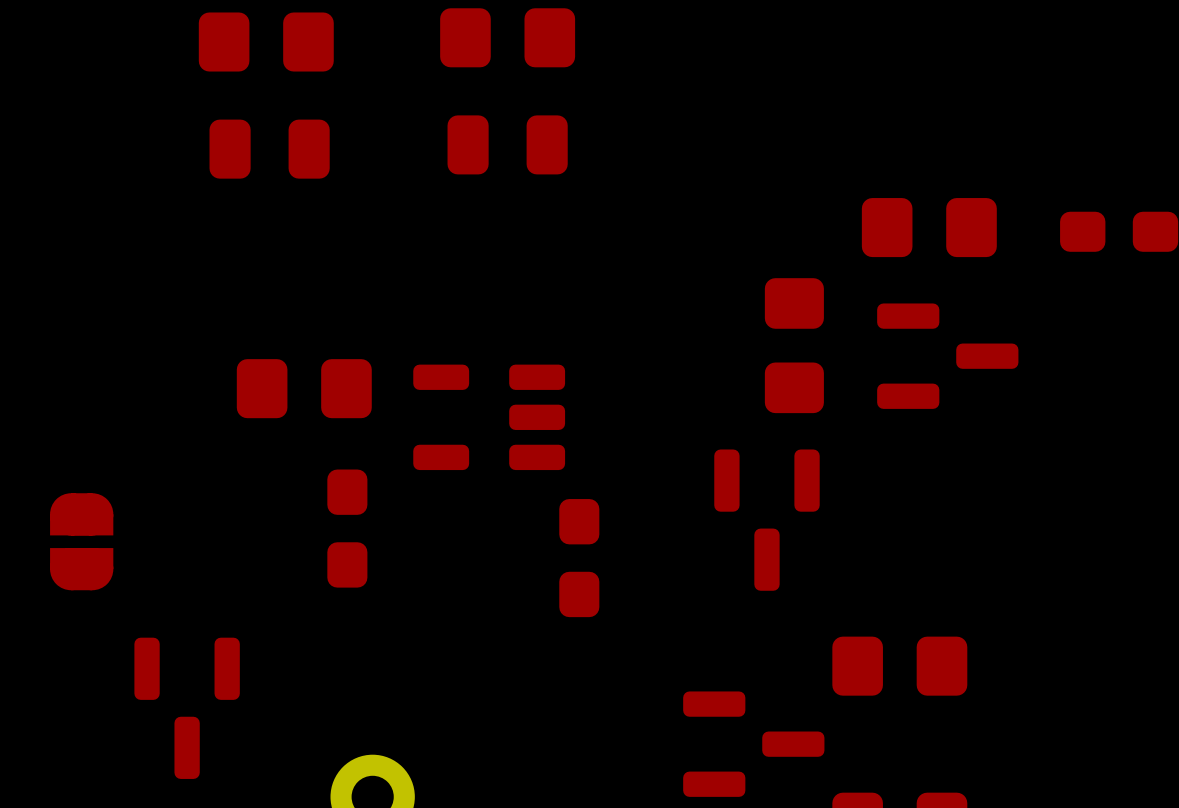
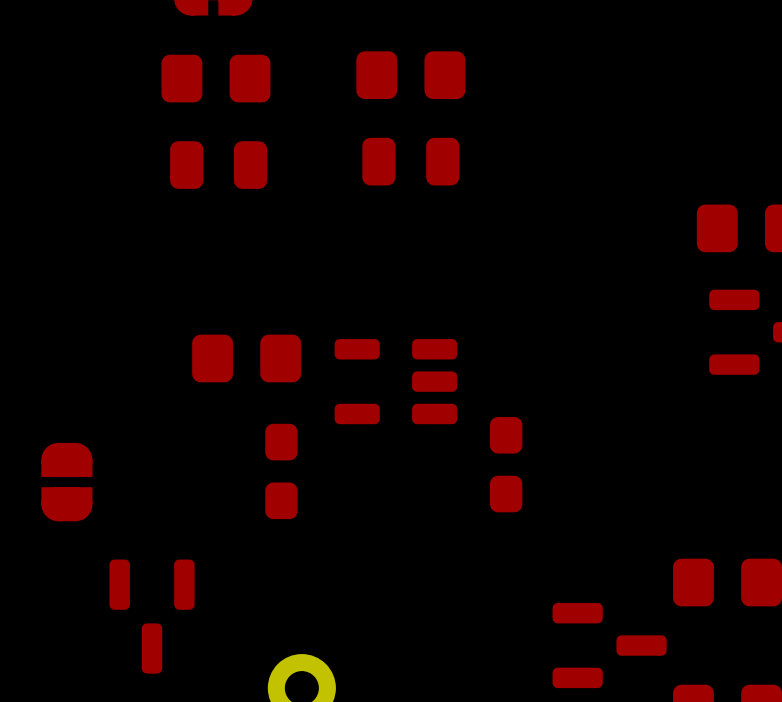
part: (794, 345) -> none
part: (766, 520) -> none
part position: (579, 558) -> (506, 464)

